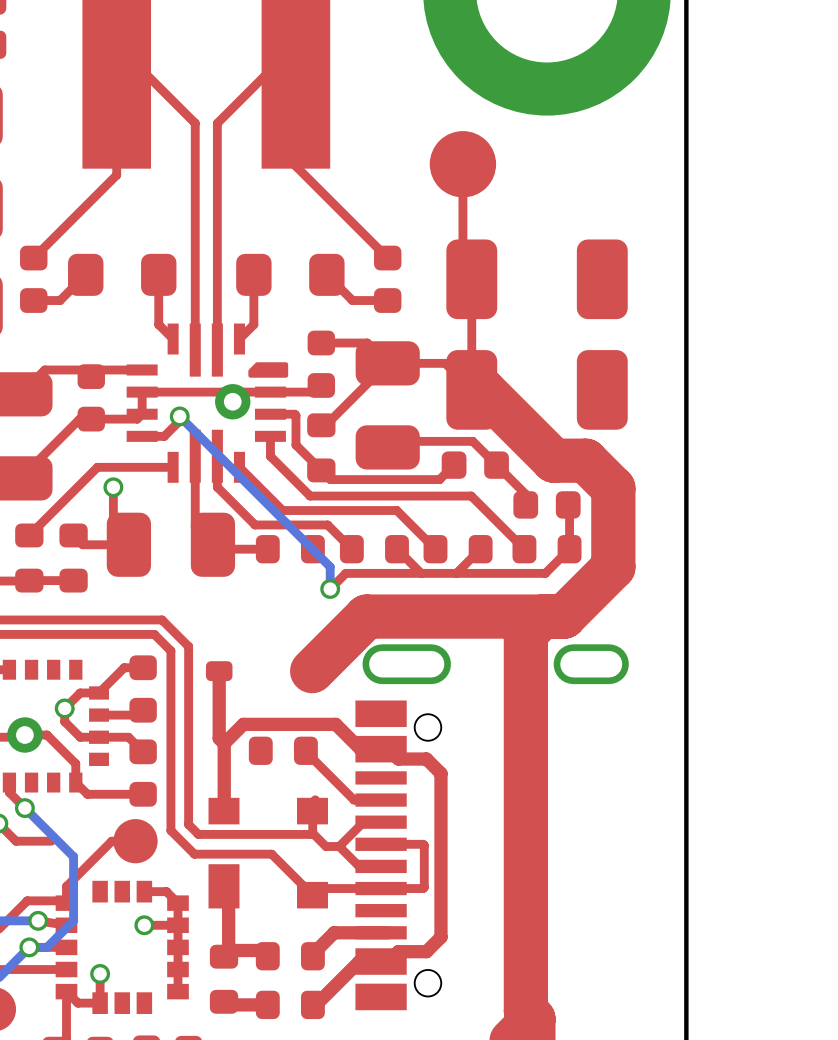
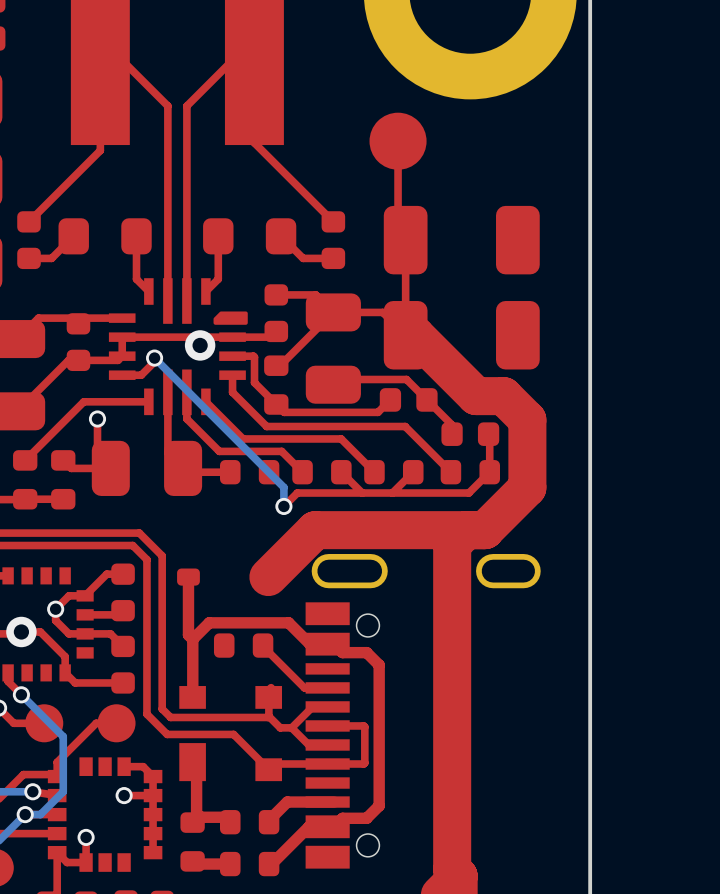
part: none -> (44, 723)

